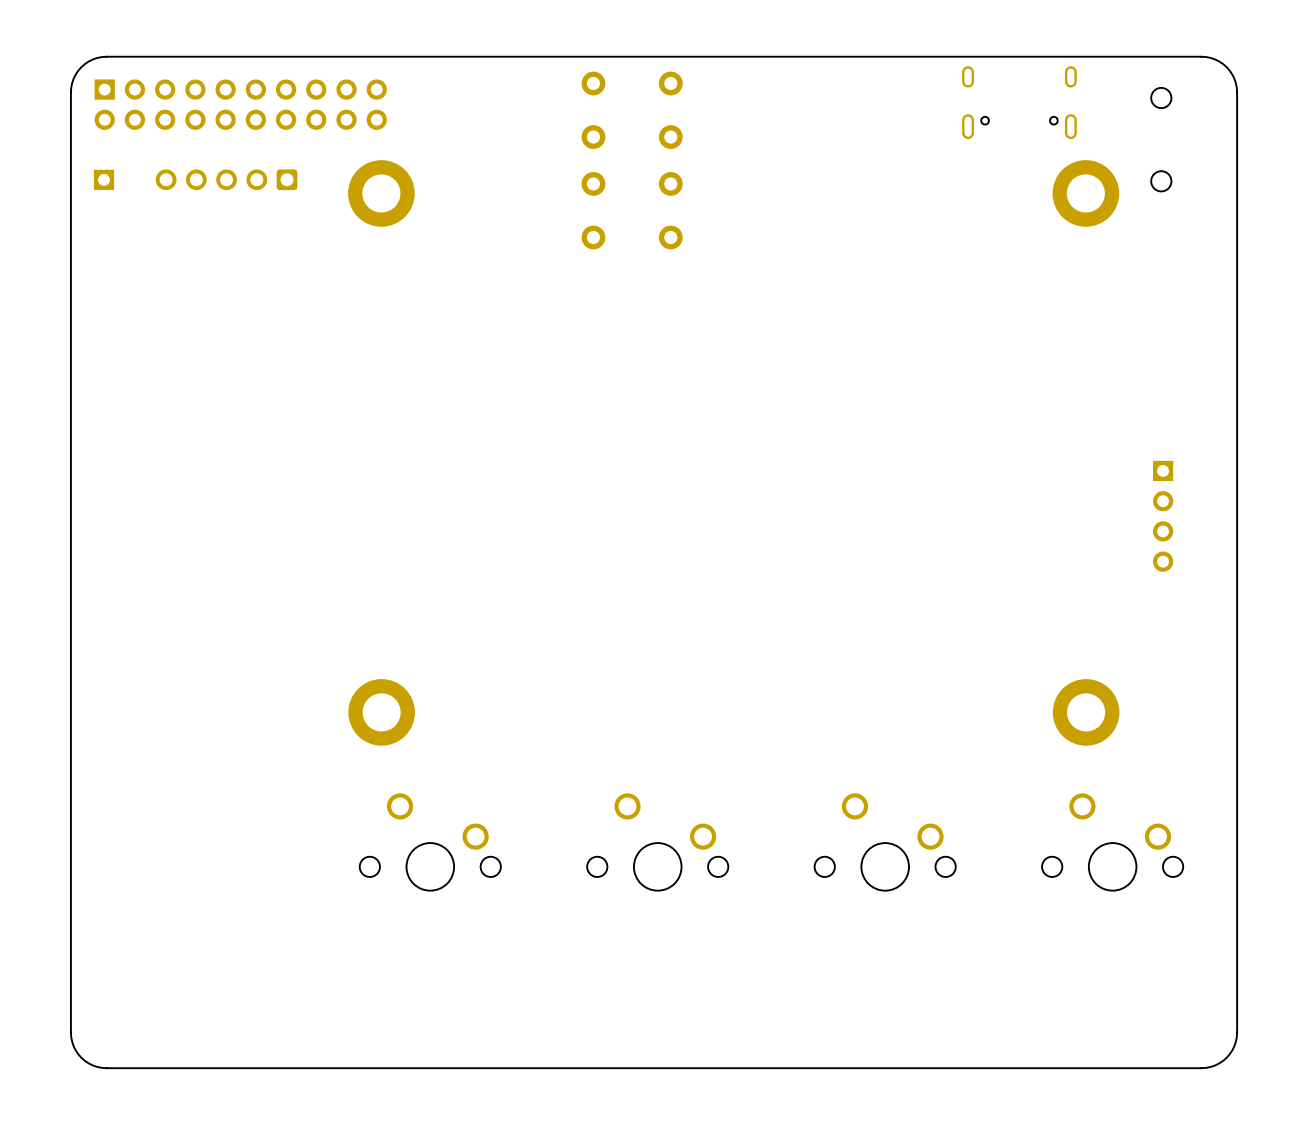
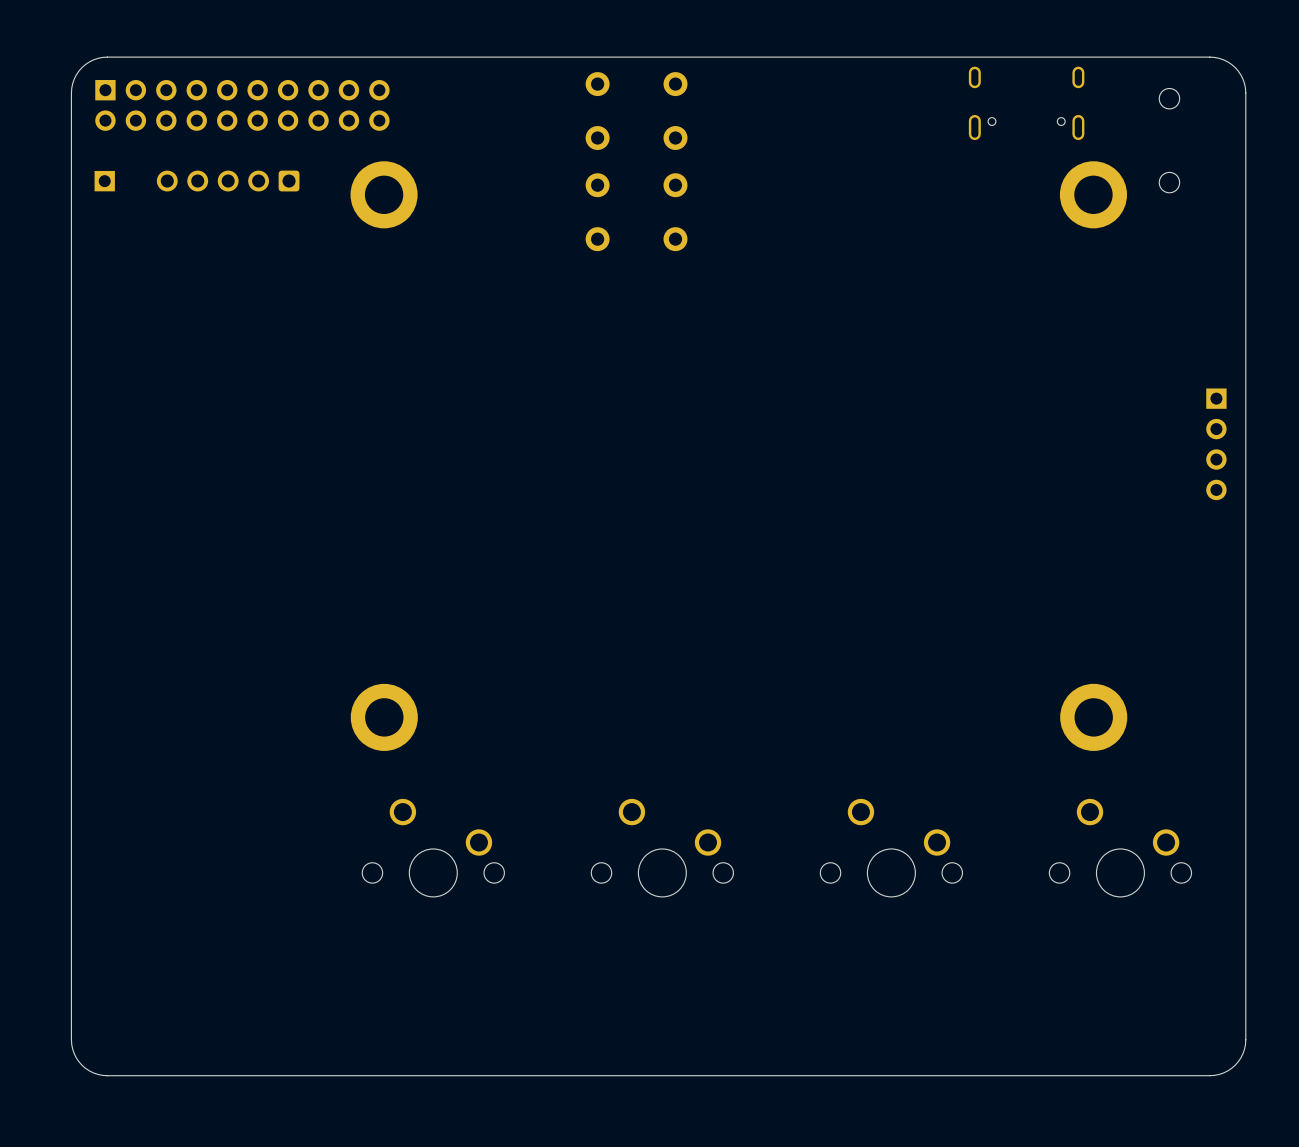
part position: (1163, 516) -> (1216, 444)

